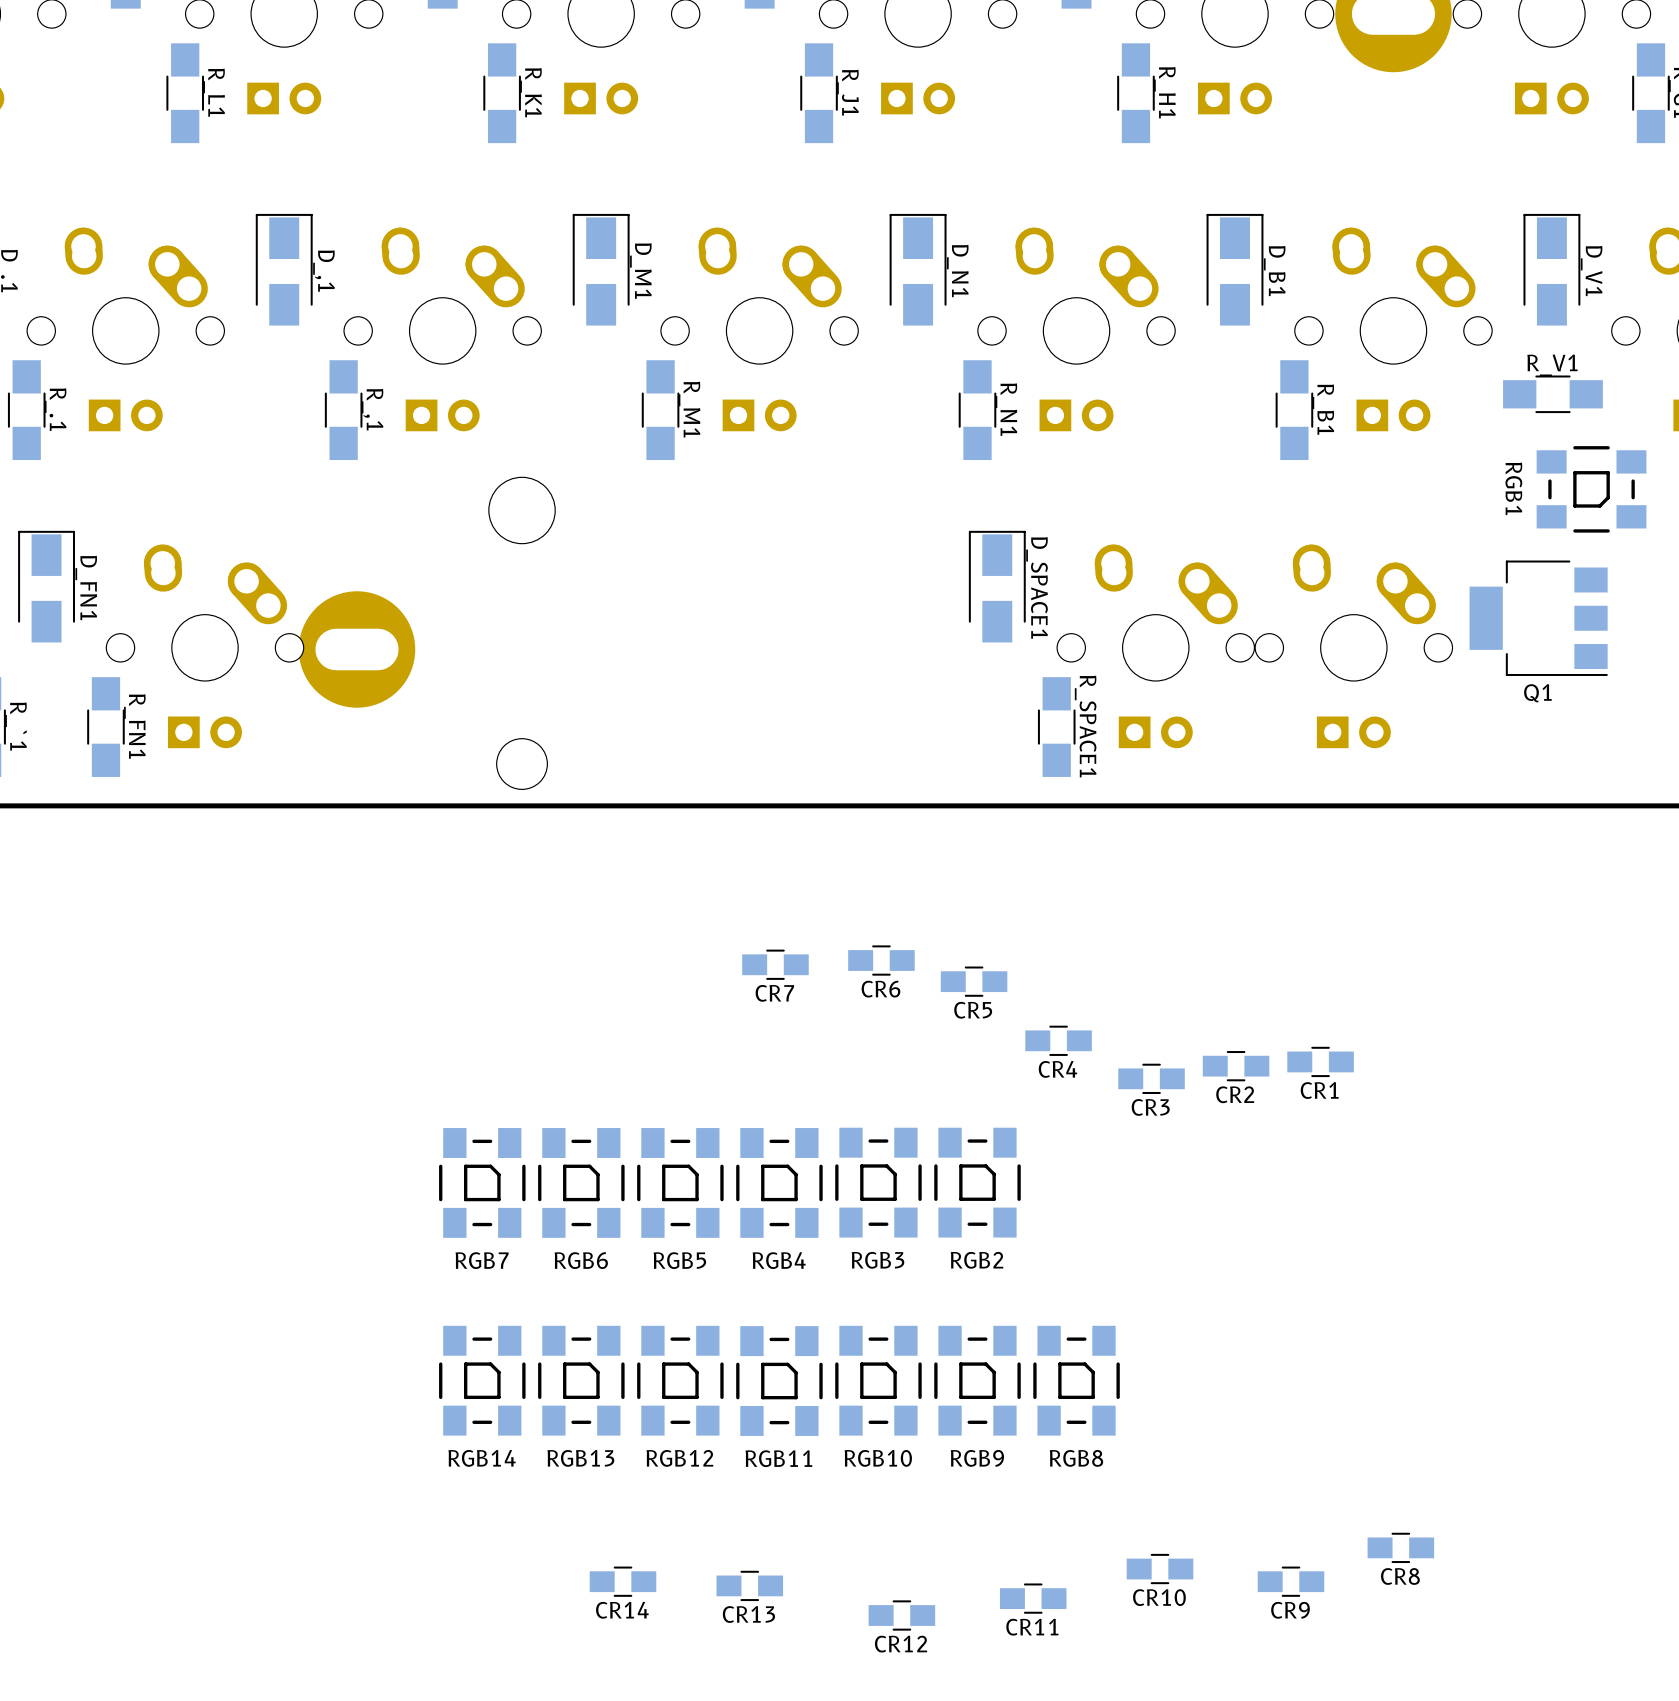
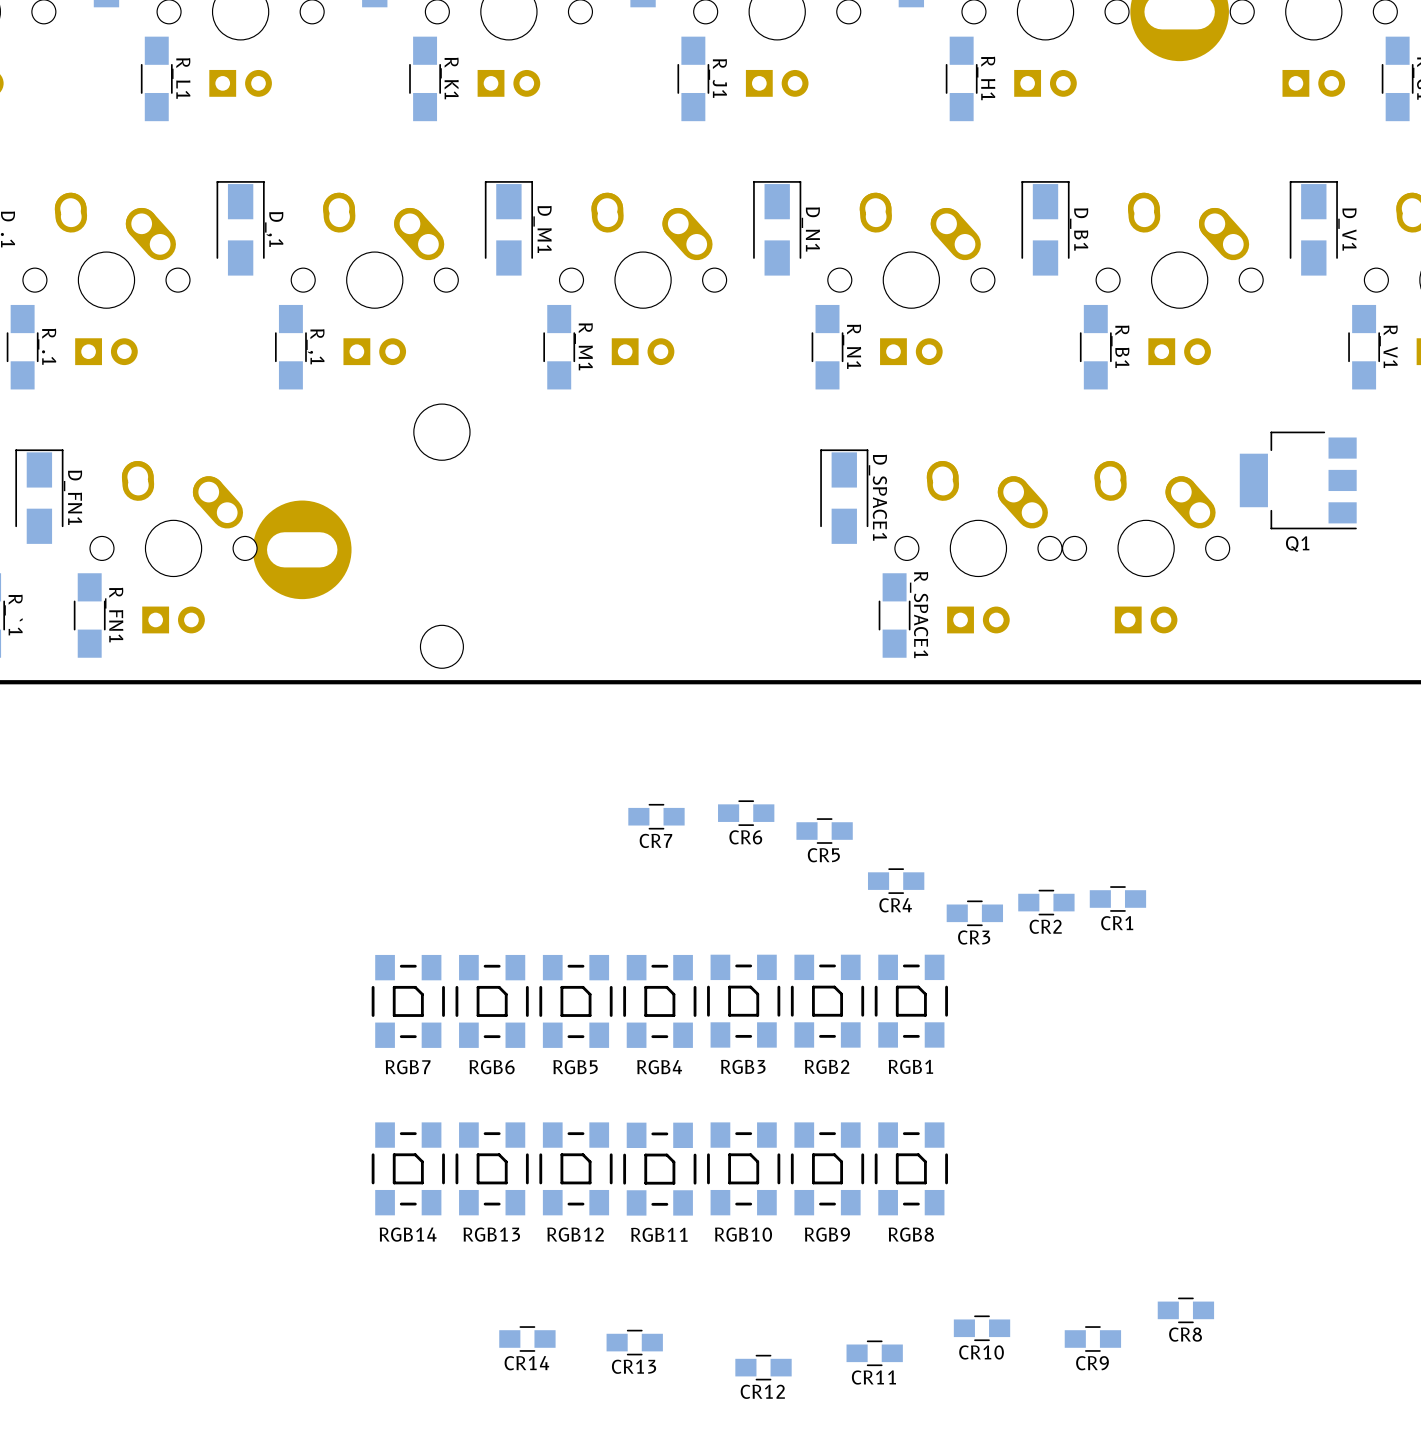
R_V1 rotation: 0° (1552, 394) -> 90° clockwise (1364, 347)
R_V1 position: (1552, 394) -> (1364, 347)
RGB1 rotation: 0° (1591, 489) -> 90° counterclockwise (911, 1001)
RGB1 position: (1591, 489) -> (911, 1001)
Q1 position: (1538, 618) -> (1298, 480)

